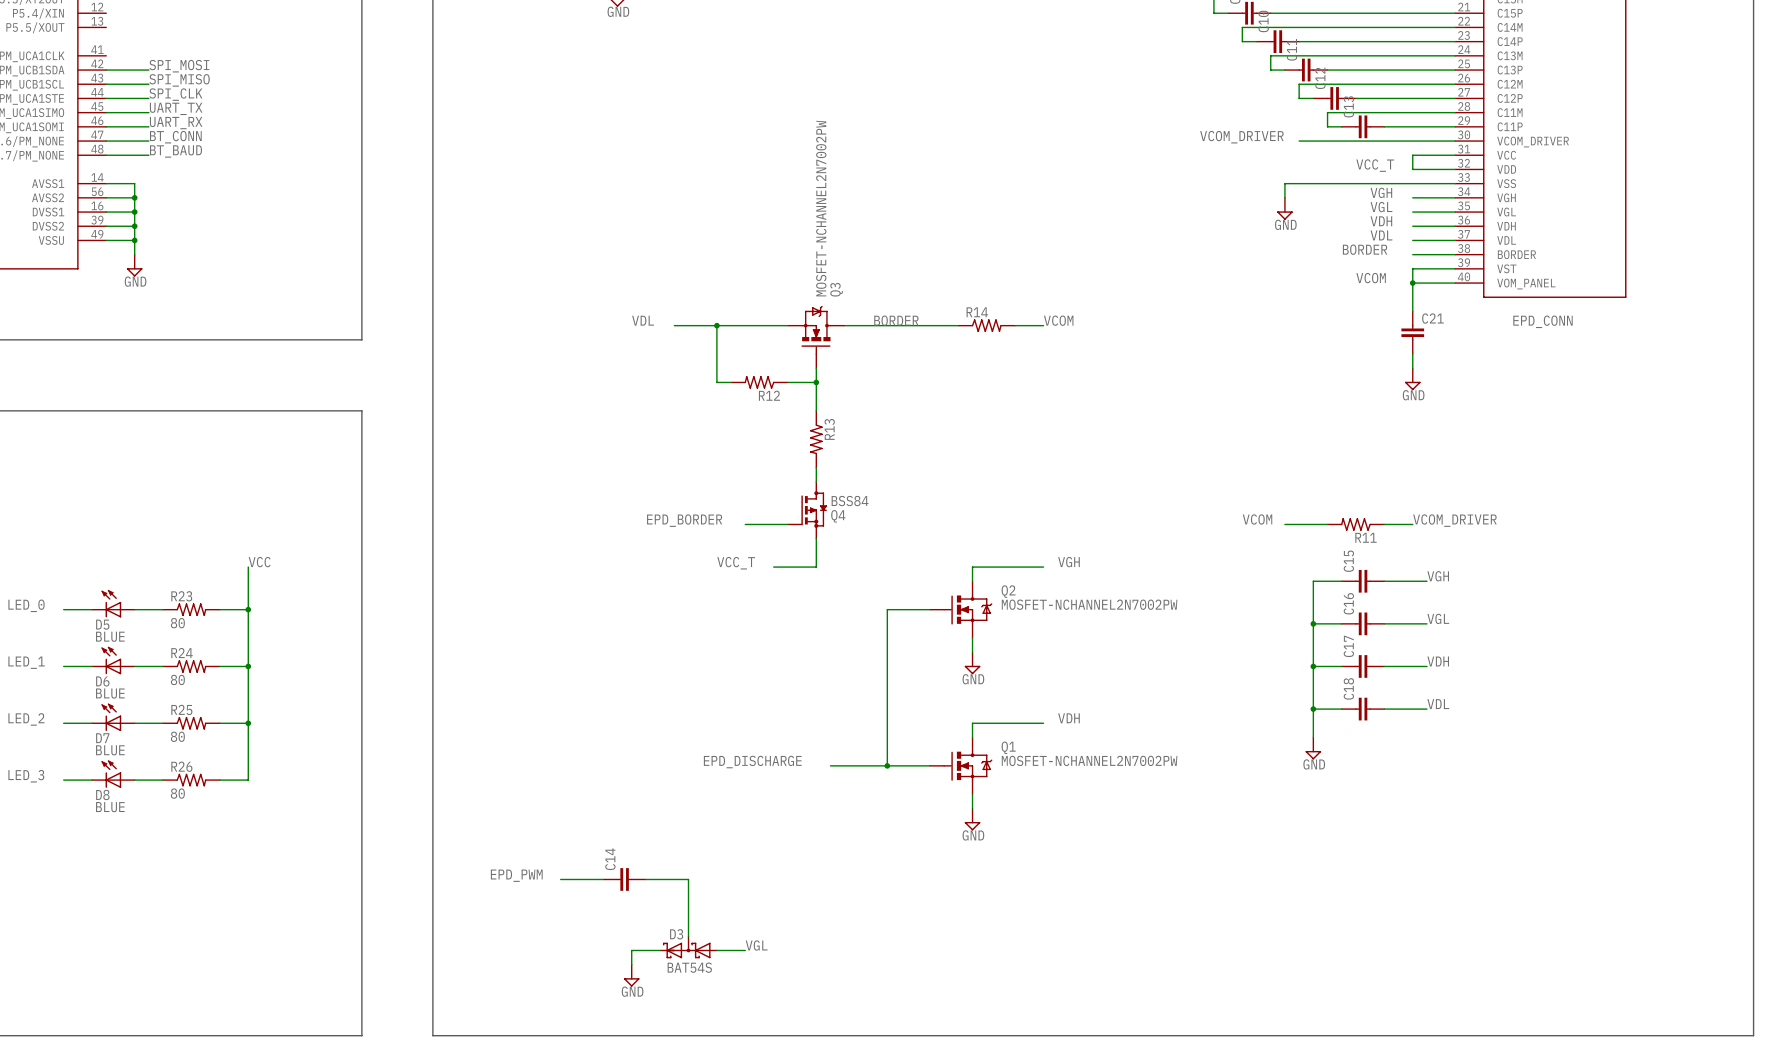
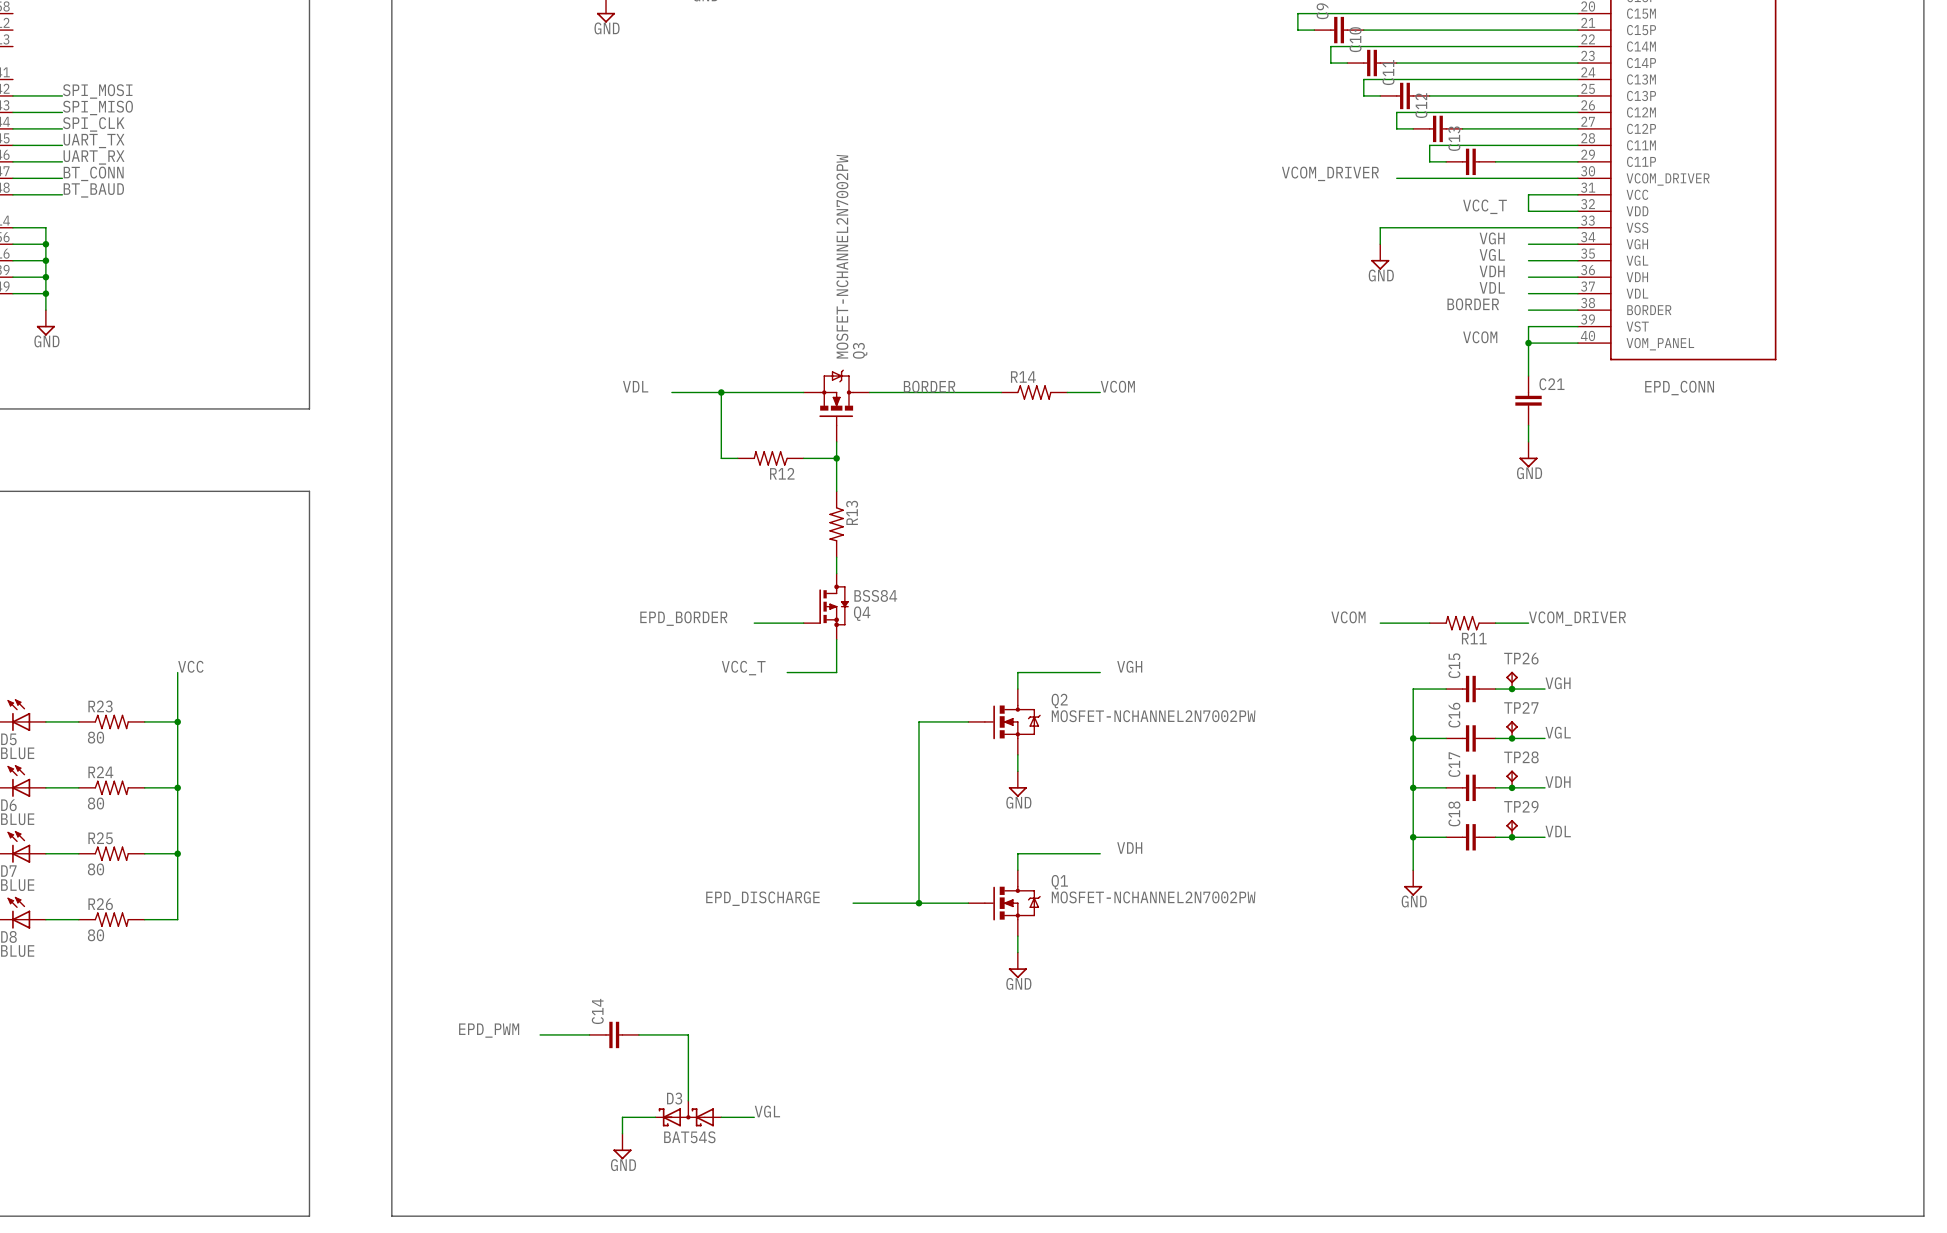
TP26: none -> (1512, 680)
junction: none -> (1512, 689)
TP27: none -> (1512, 729)
junction: none -> (1512, 738)
TP28: none -> (1512, 779)
junction: none -> (1512, 787)
TP29: none -> (1512, 828)
junction: none -> (1512, 837)

